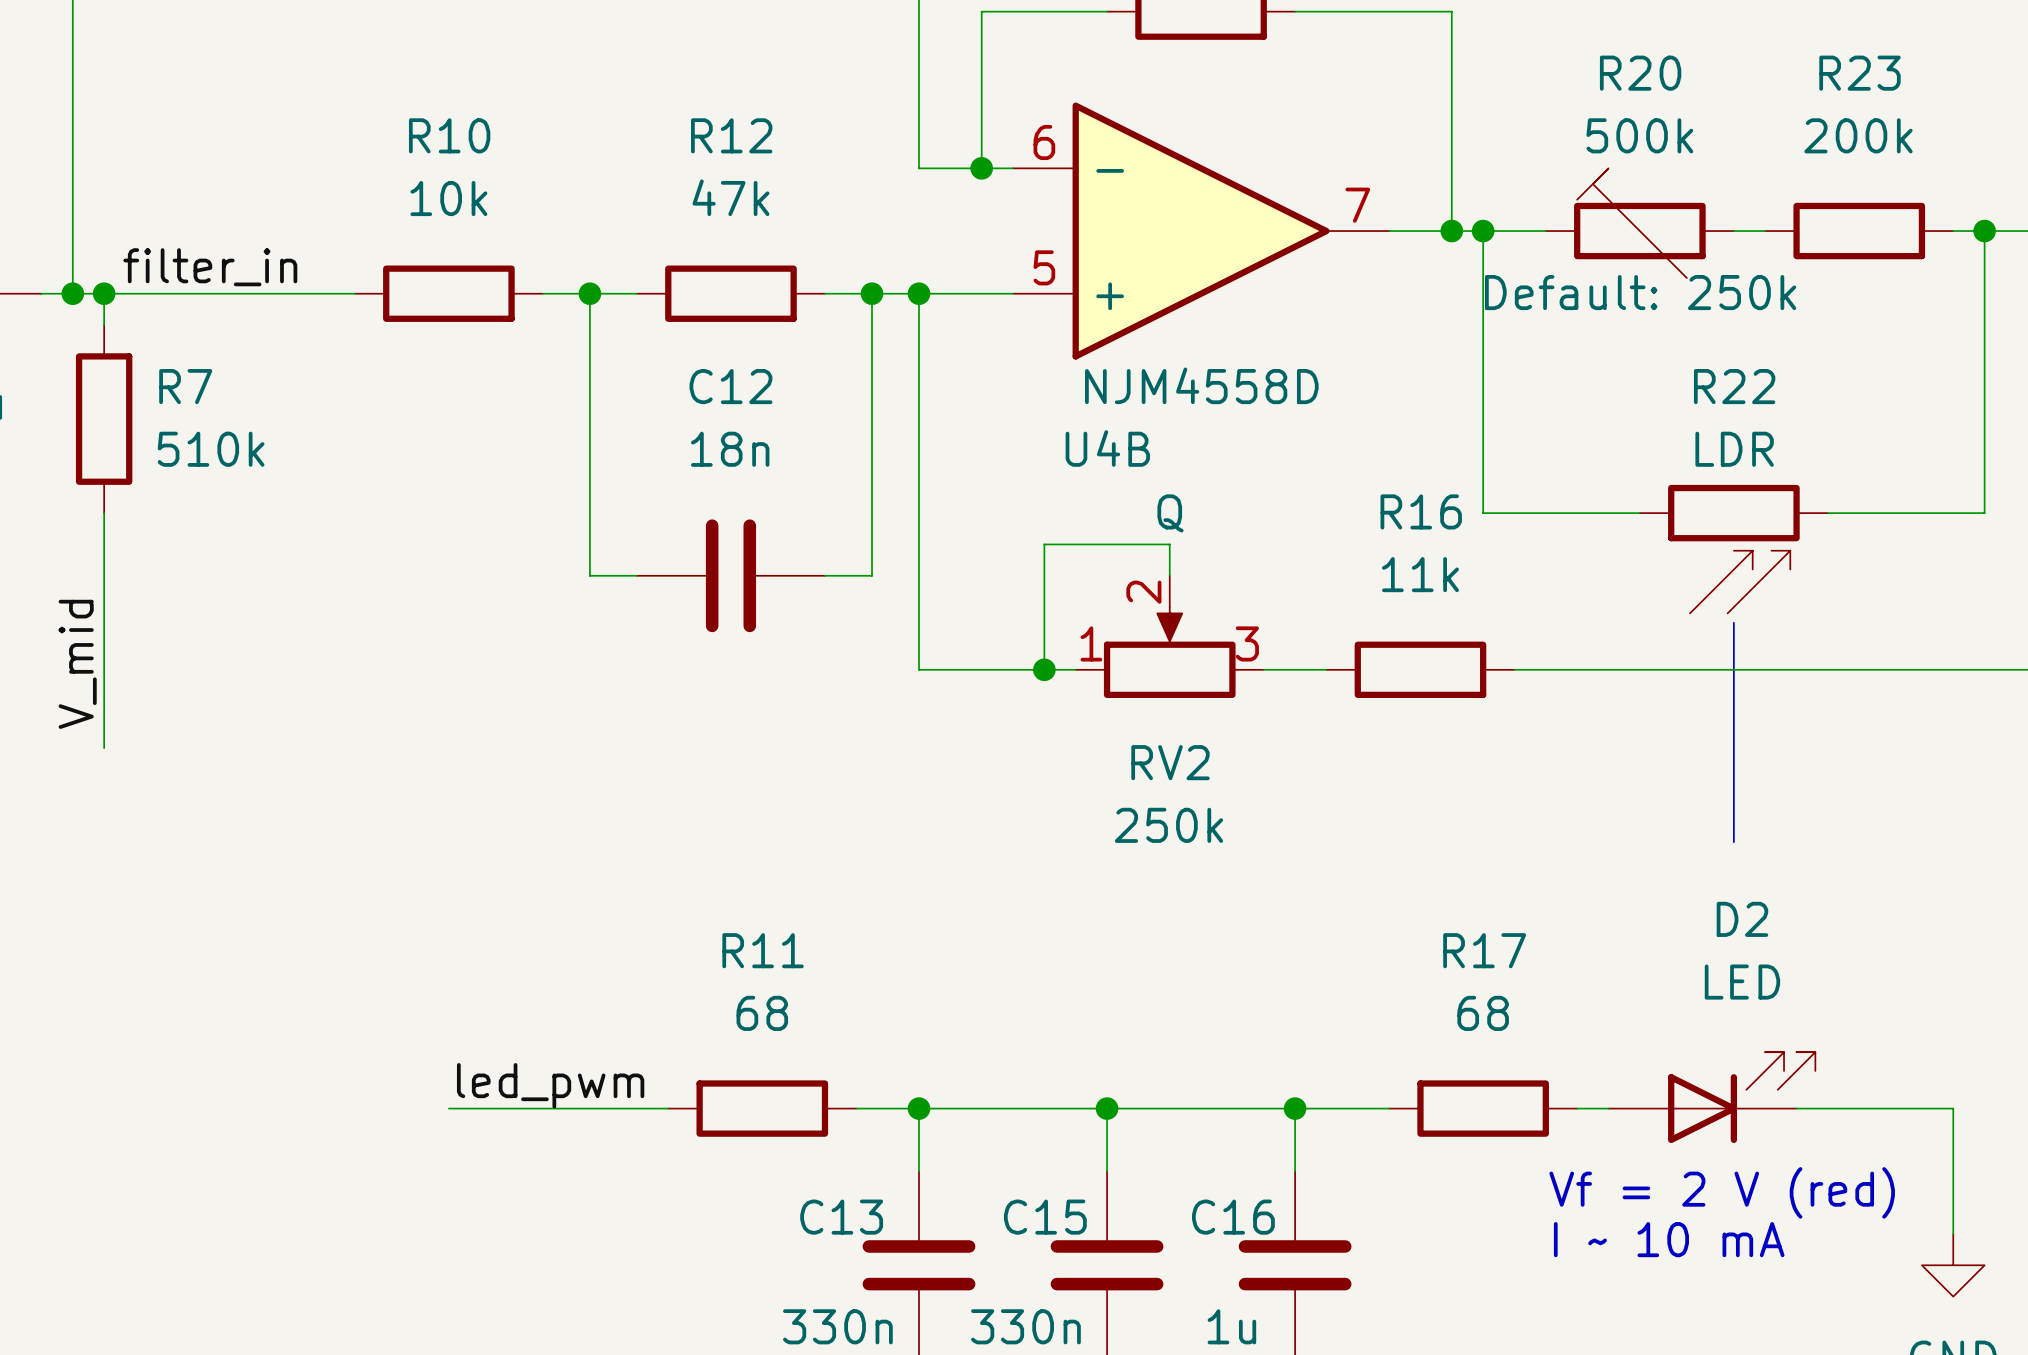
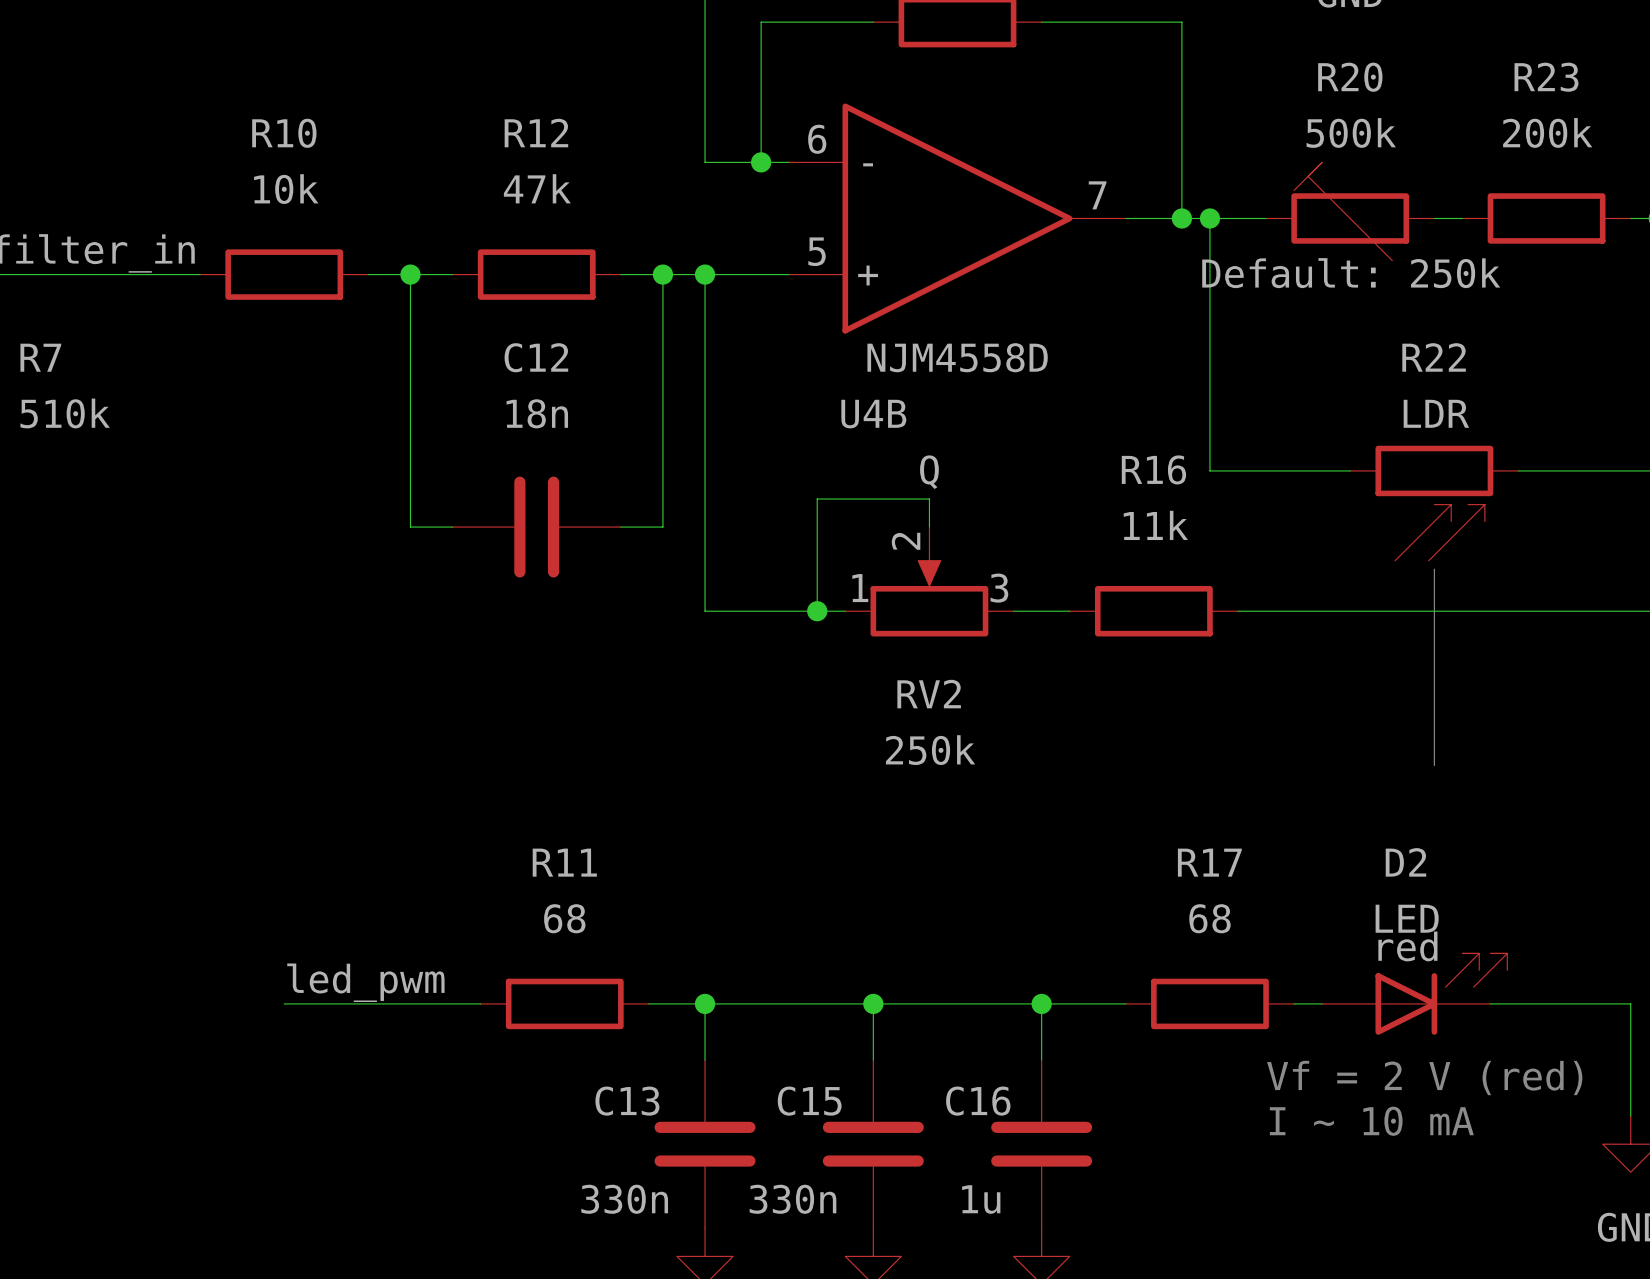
D2 name position: D2 (1742, 919) -> D2 (1405, 862)
D2 value position: LED (1742, 982) -> LED (1407, 918)
D2 text: none -> red (1407, 946)

